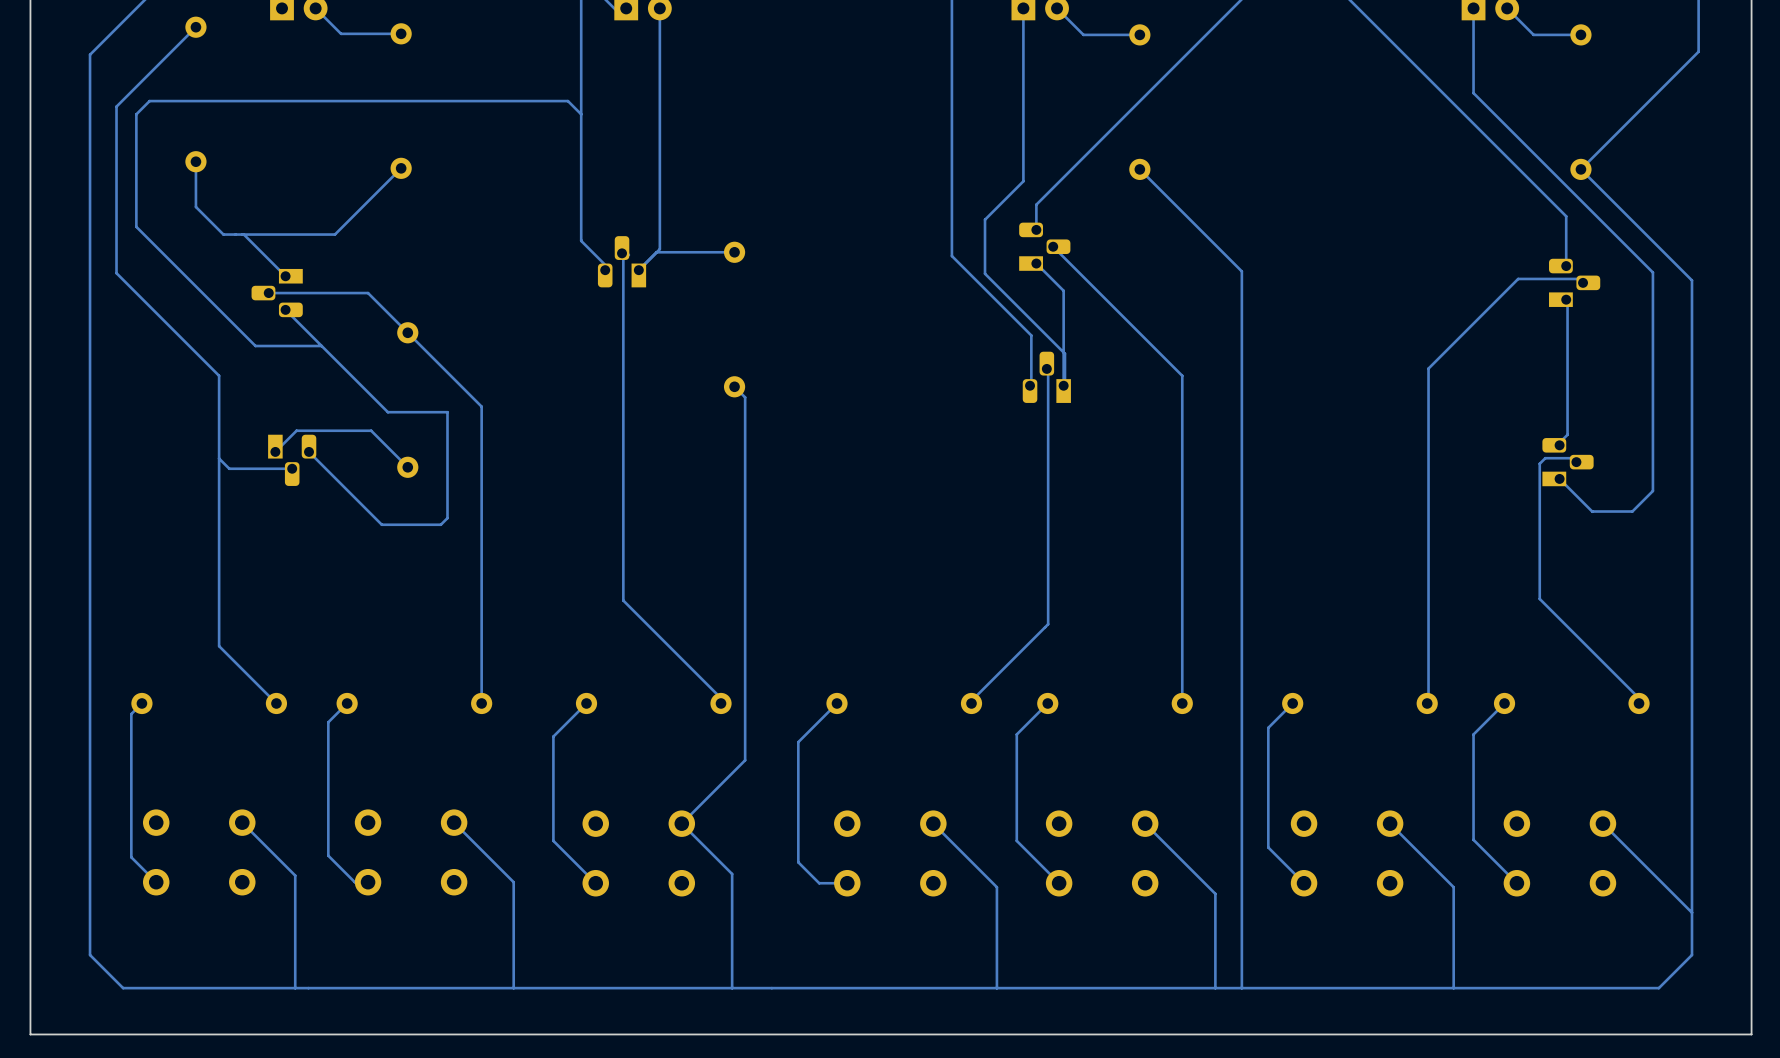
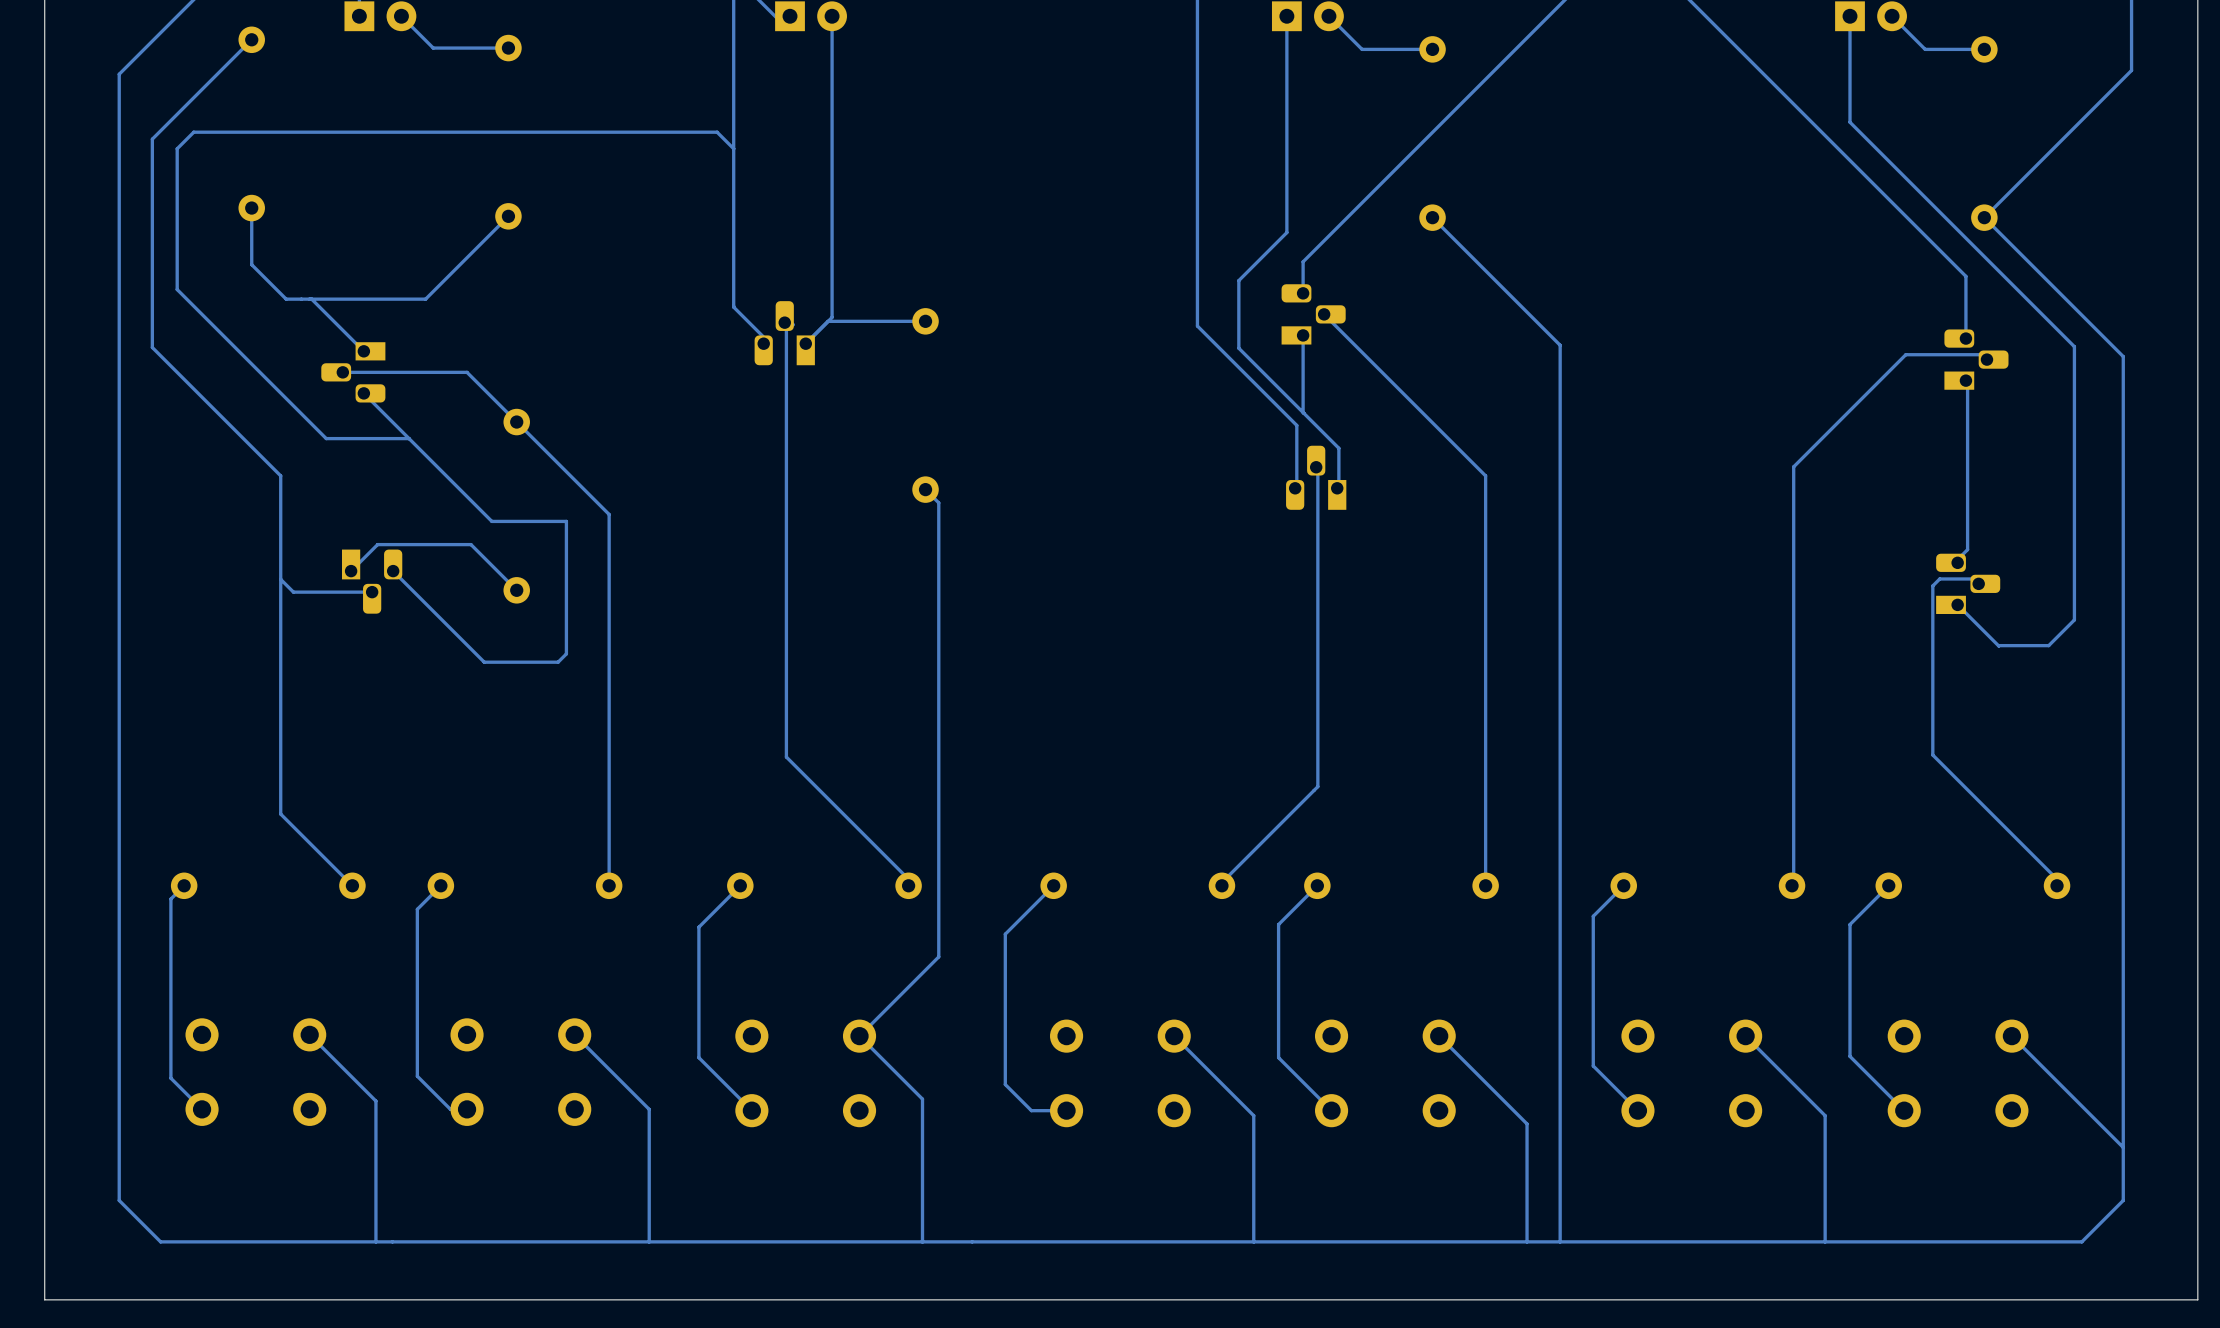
track: (1036, 263) (1063, 290) (1063, 385) -> (1303, 335) (1303, 412)

